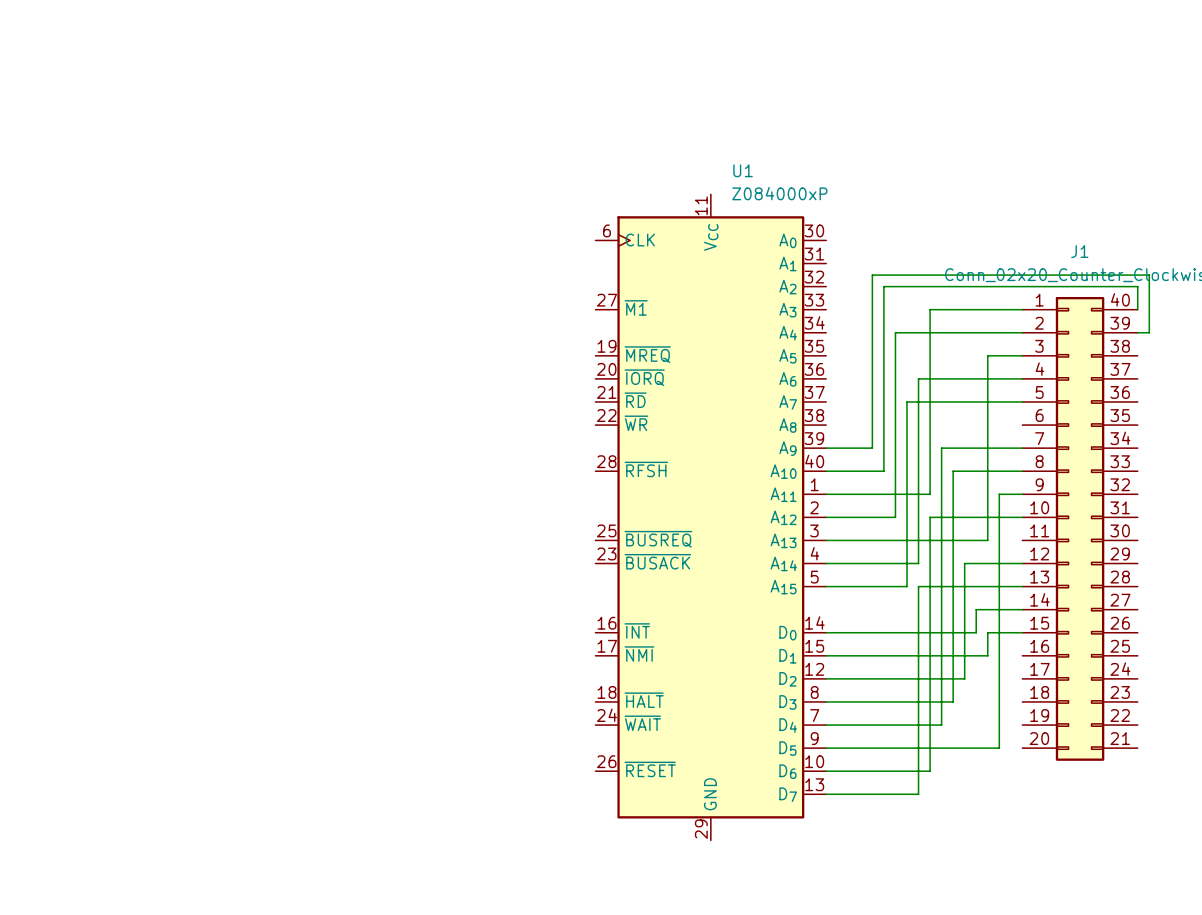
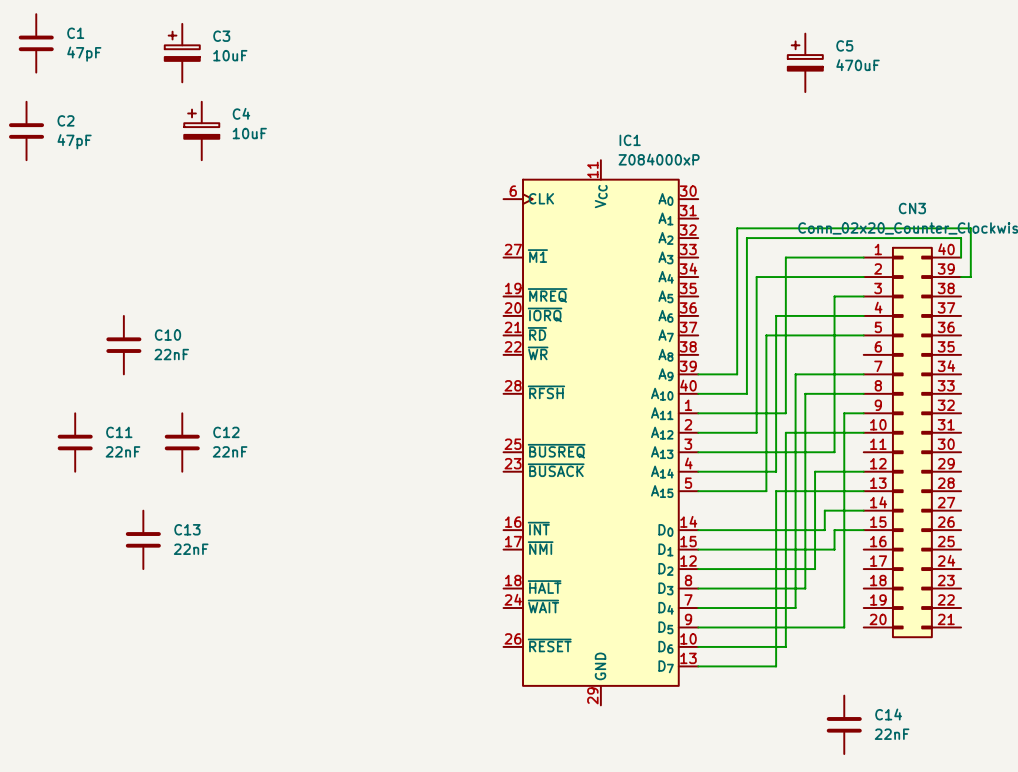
C1: none -> 47pF (36, 43)
C3: none -> 10uF (182, 53)
C5: none -> 470uF (805, 62)
C2: none -> 47pF (26, 130)
C4: none -> 10uF (201, 130)
U1 name: U1 (743, 170) -> IC1 (630, 140)
J1 name: J1 (1079, 251) -> CN3 (912, 208)
C10: none -> 22nF (123, 345)
C11: none -> 22nF (75, 442)
C12: none -> 22nF (182, 442)
C13: none -> 22nF (143, 539)
C14: none -> 22nF (844, 724)

